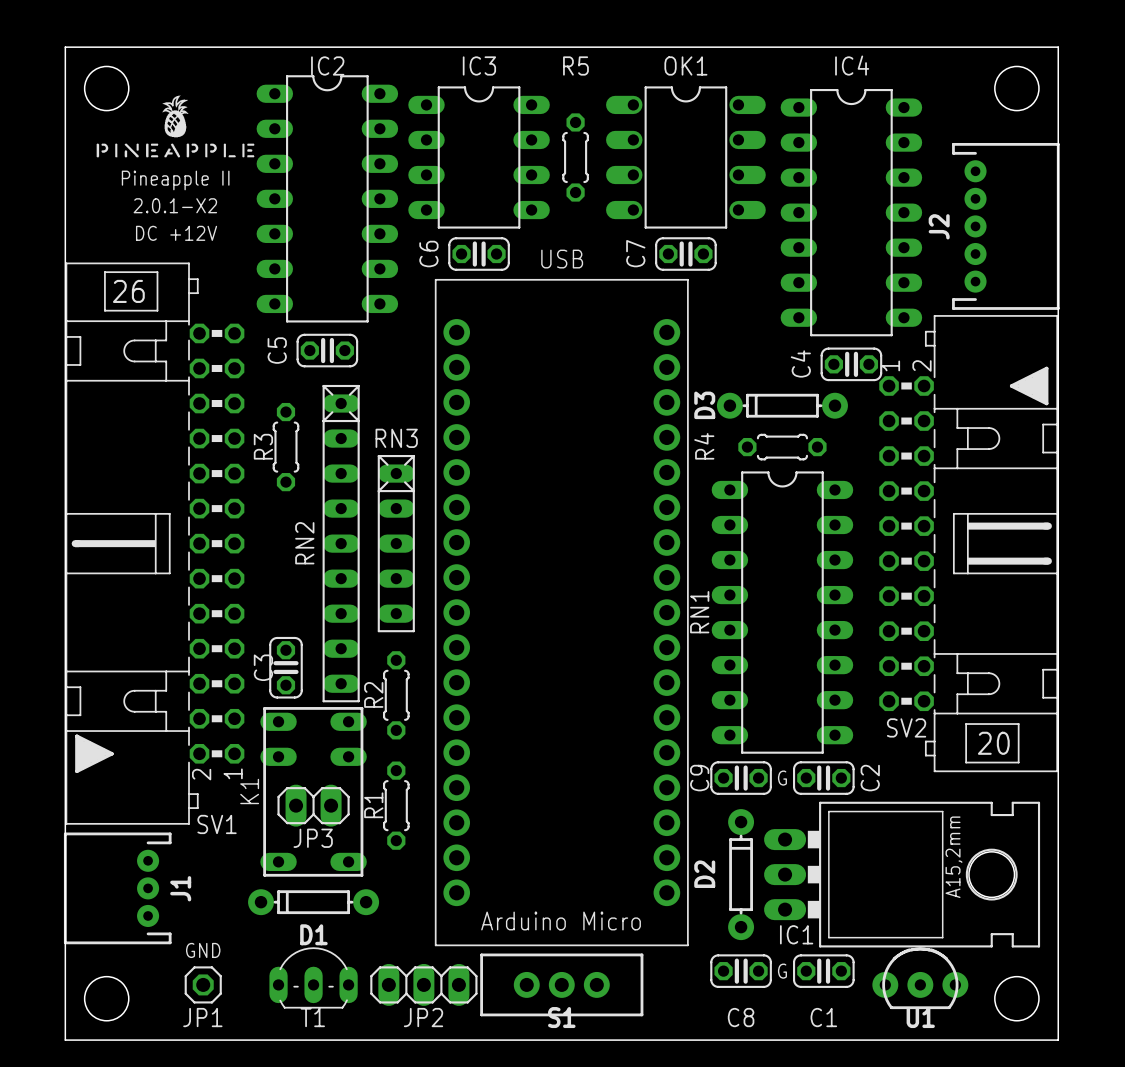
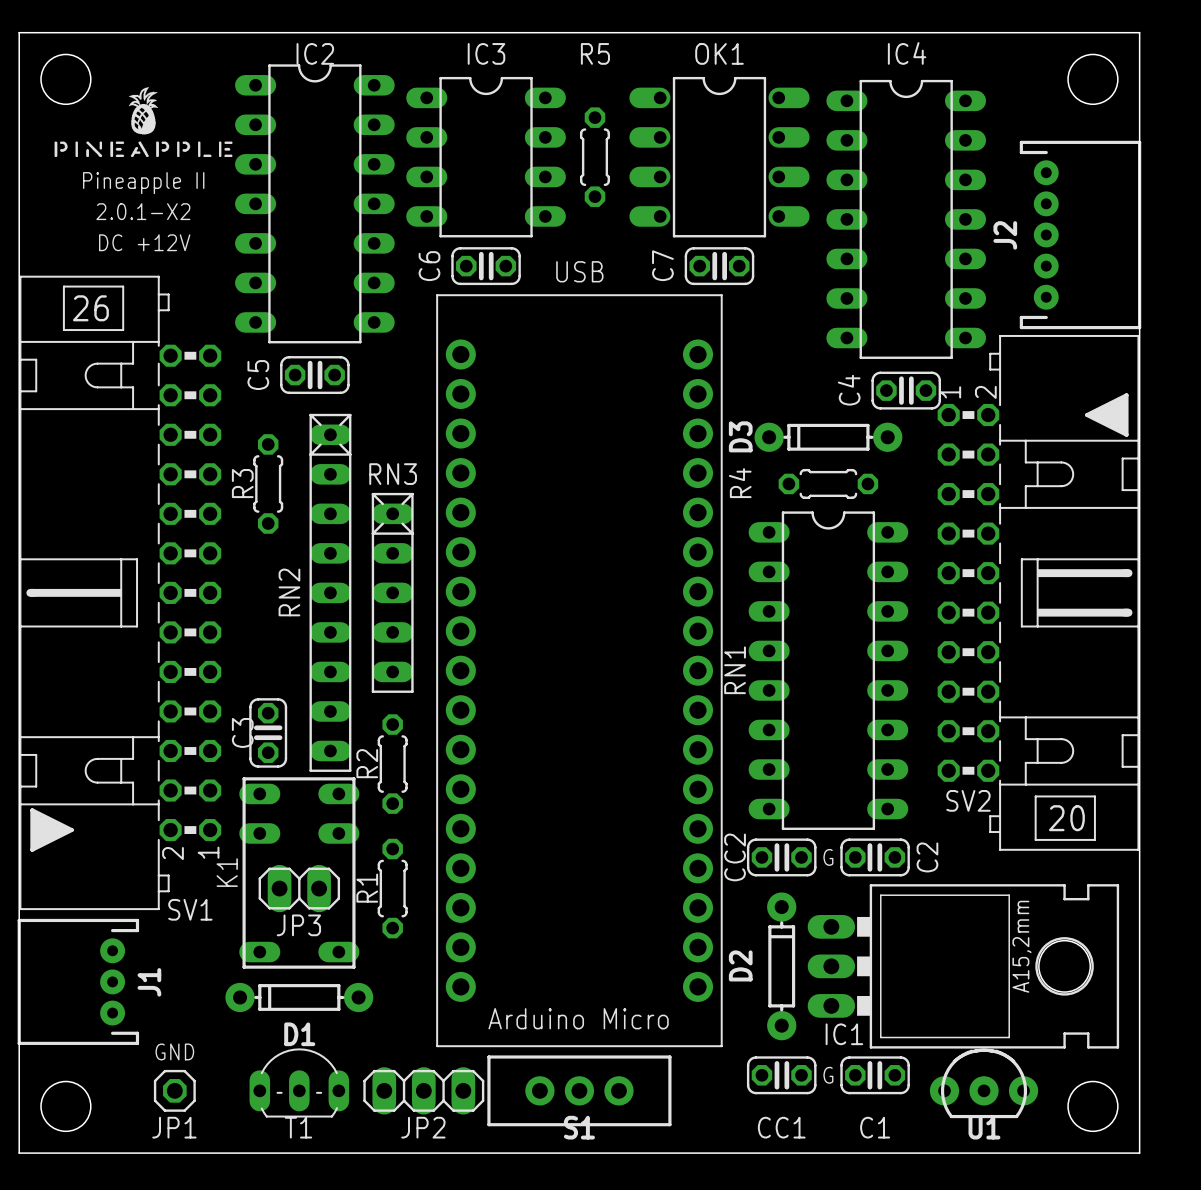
C9 name: C9 (699, 778) -> CC2 (735, 857)
C8 name: C8 (741, 1017) -> CC1 (781, 1127)

